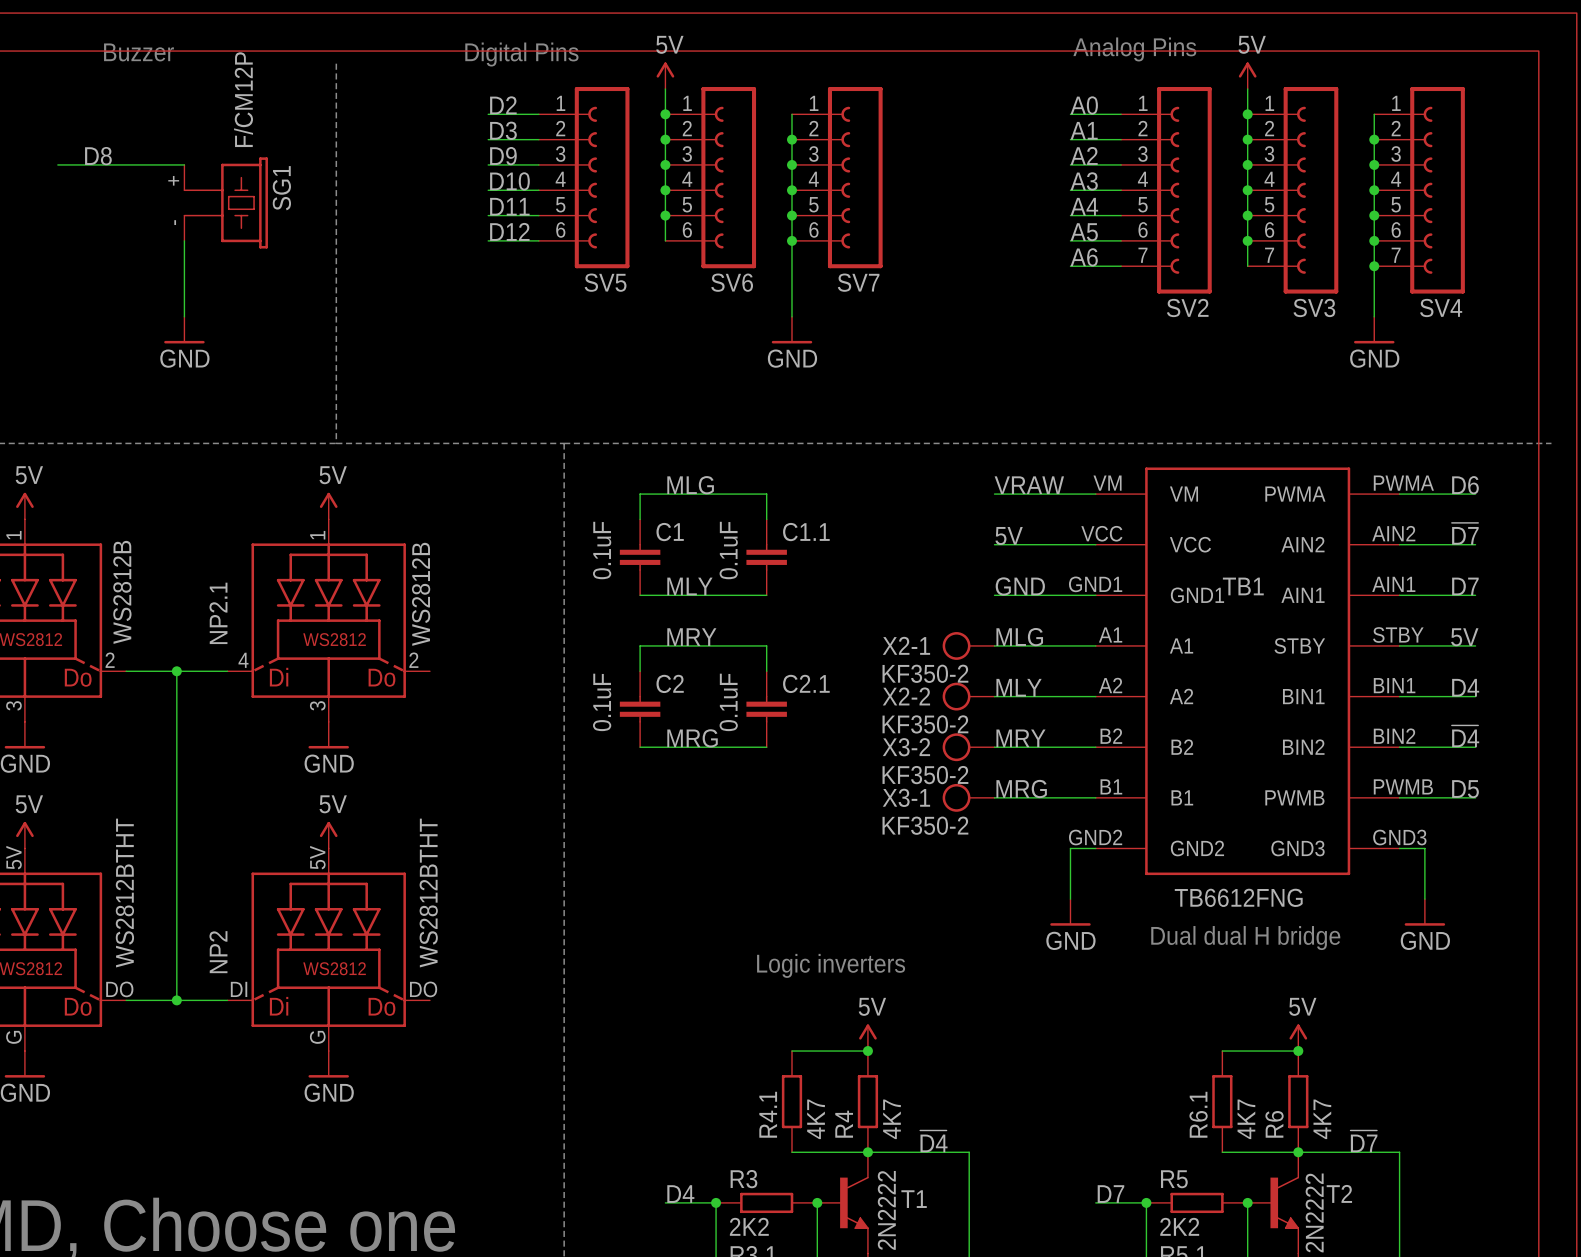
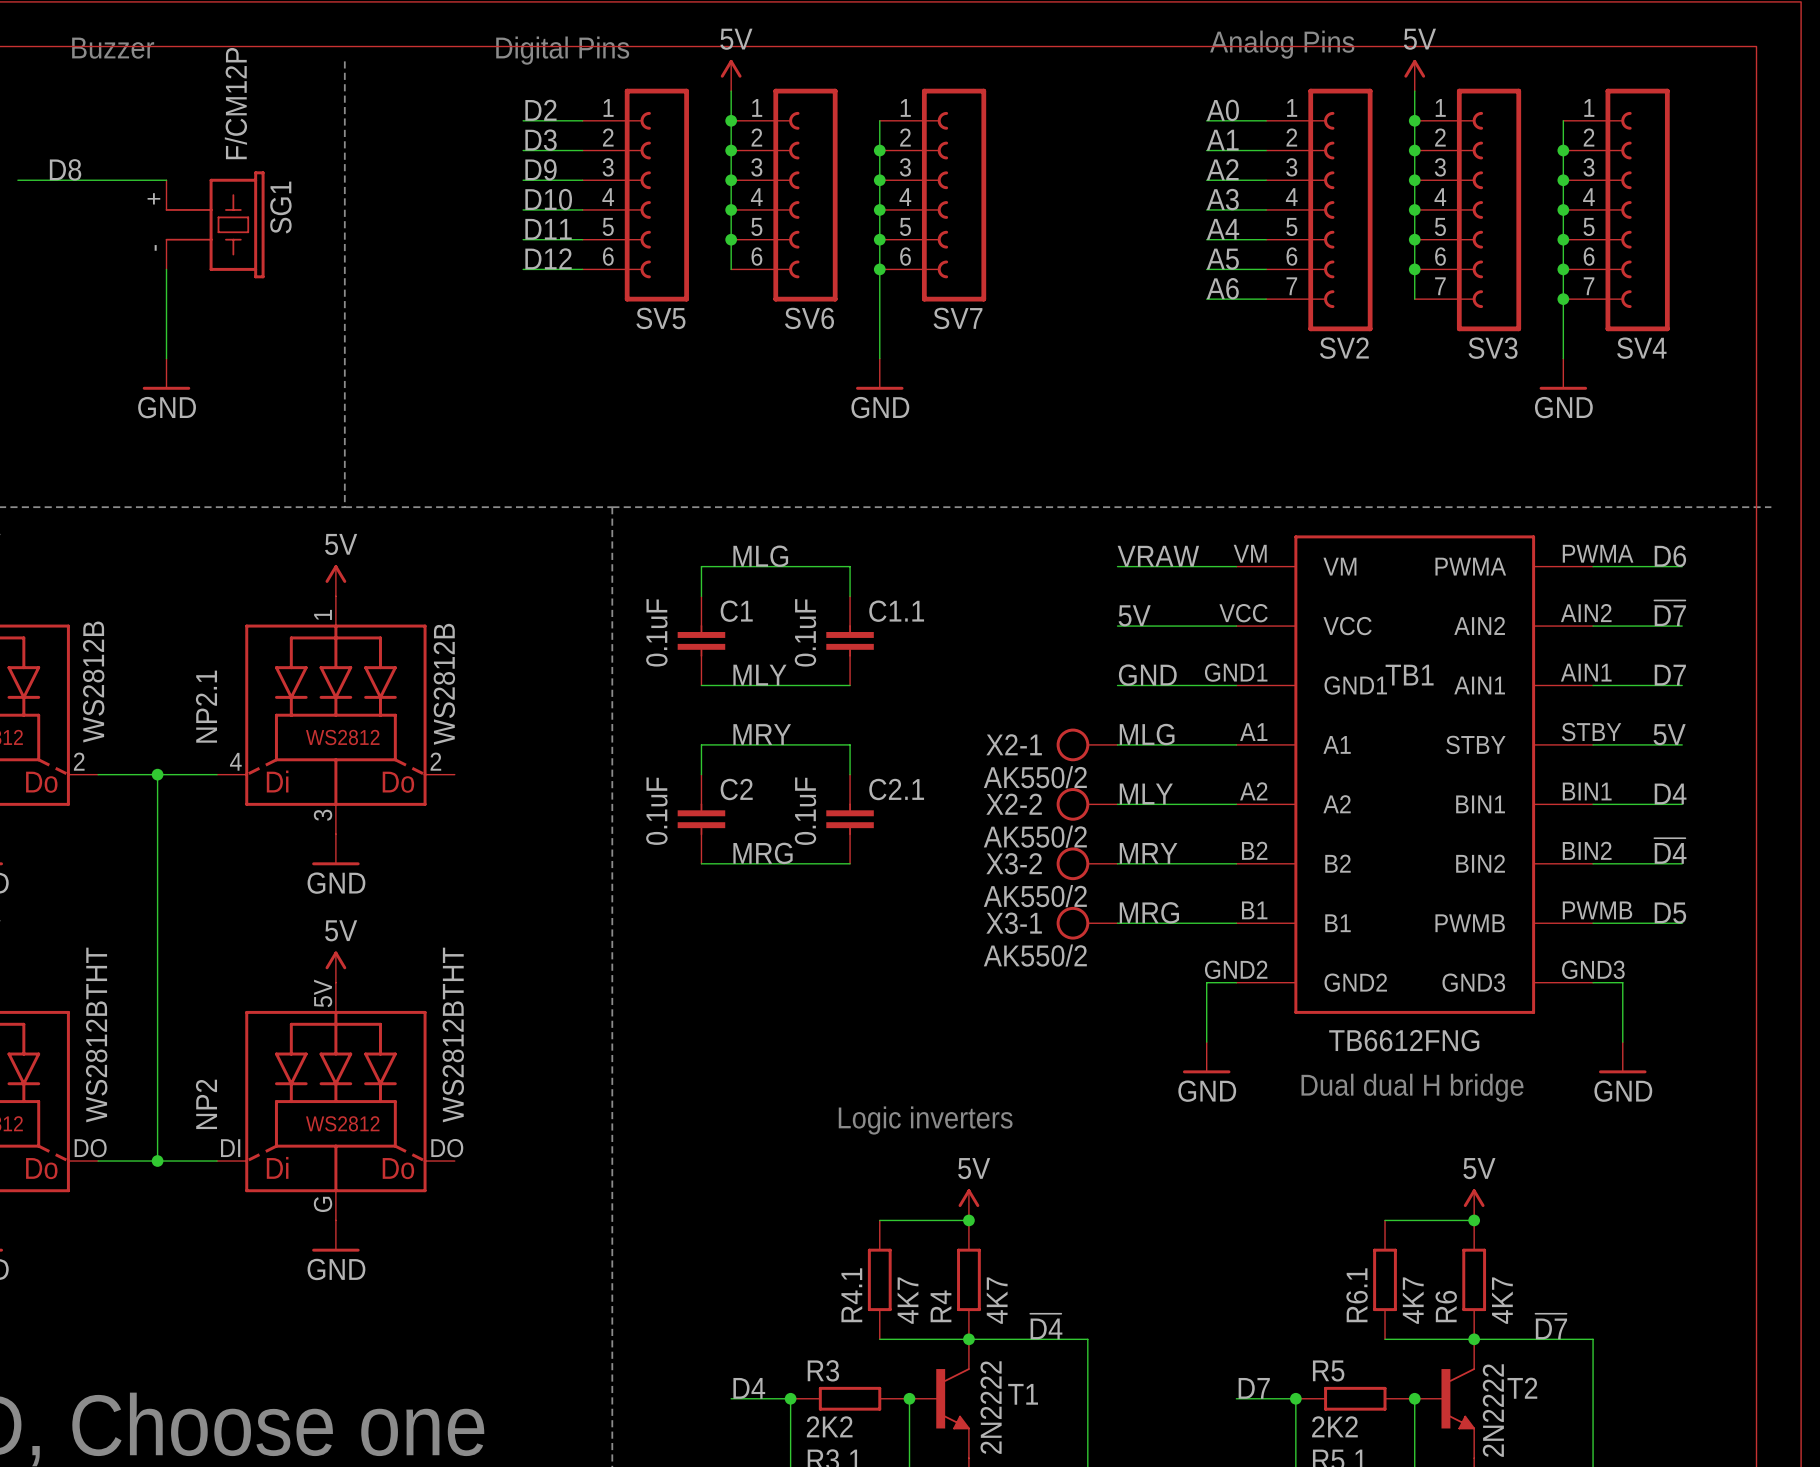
X2-1 value: KF350-2 (925, 673) -> AK550/2 (1035, 777)
X2-2 value: KF350-2 (925, 724) -> AK550/2 (1035, 836)
X3-2 value: KF350-2 (925, 775) -> AK550/2 (1035, 896)
X3-1 value: KF350-2 (925, 825) -> AK550/2 (1035, 955)

